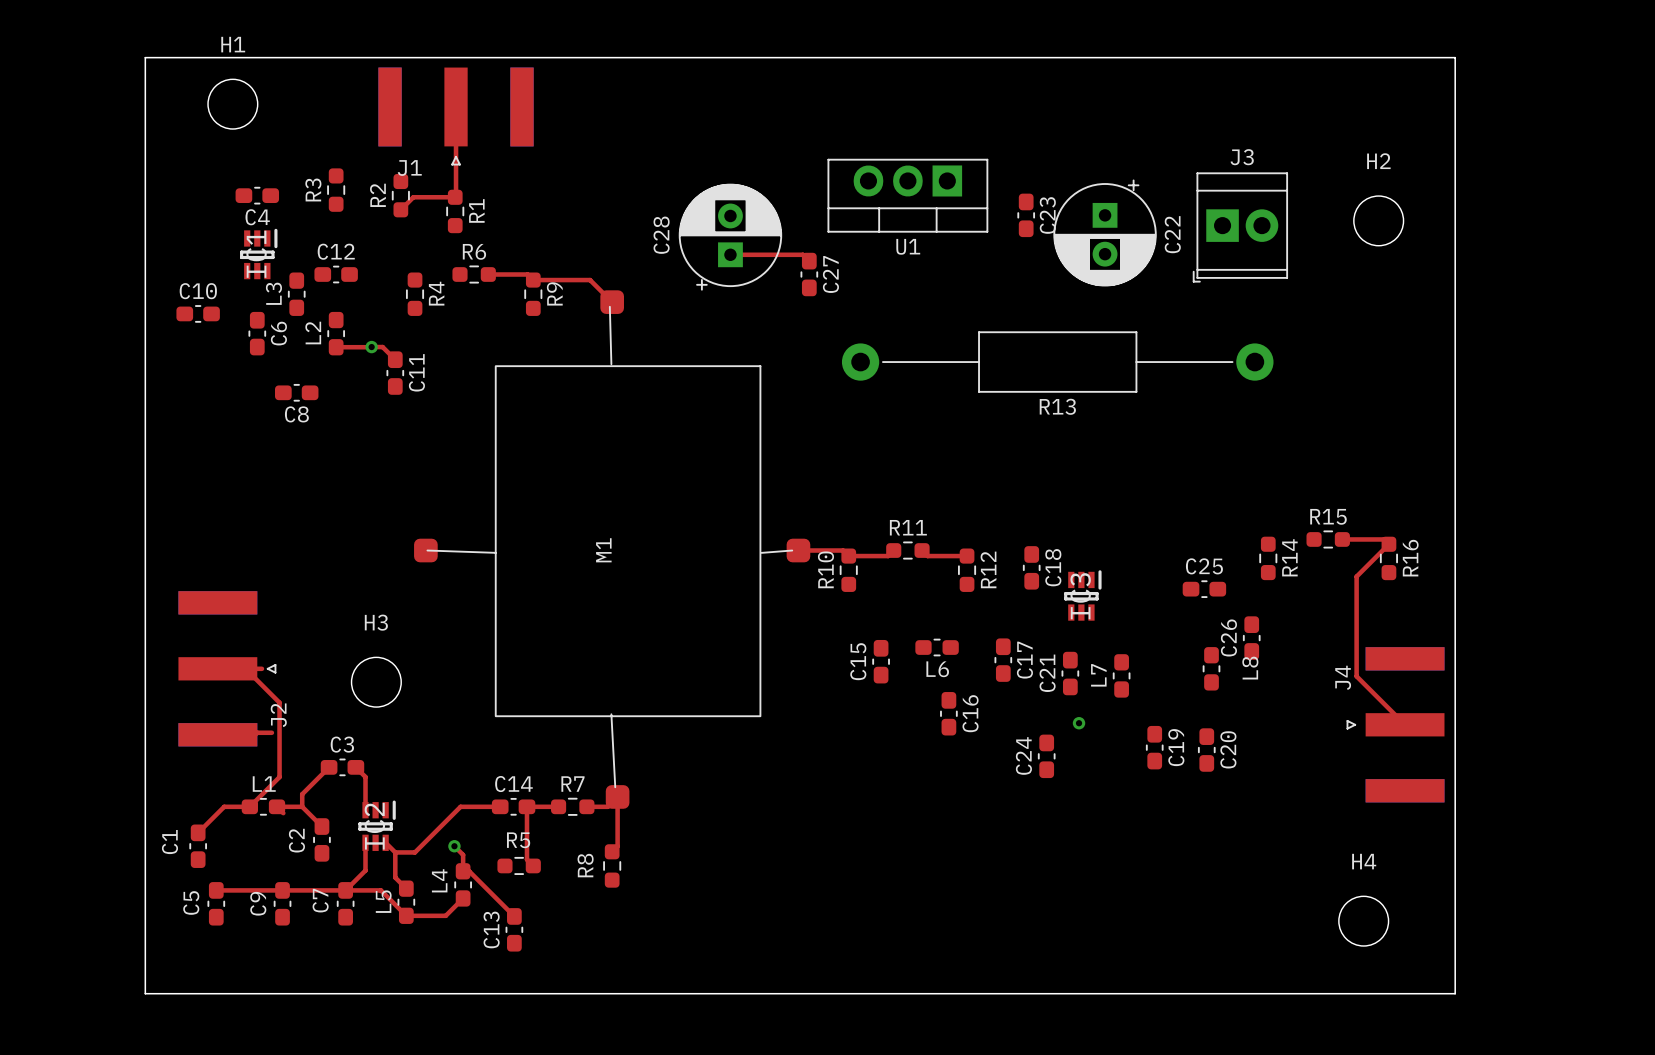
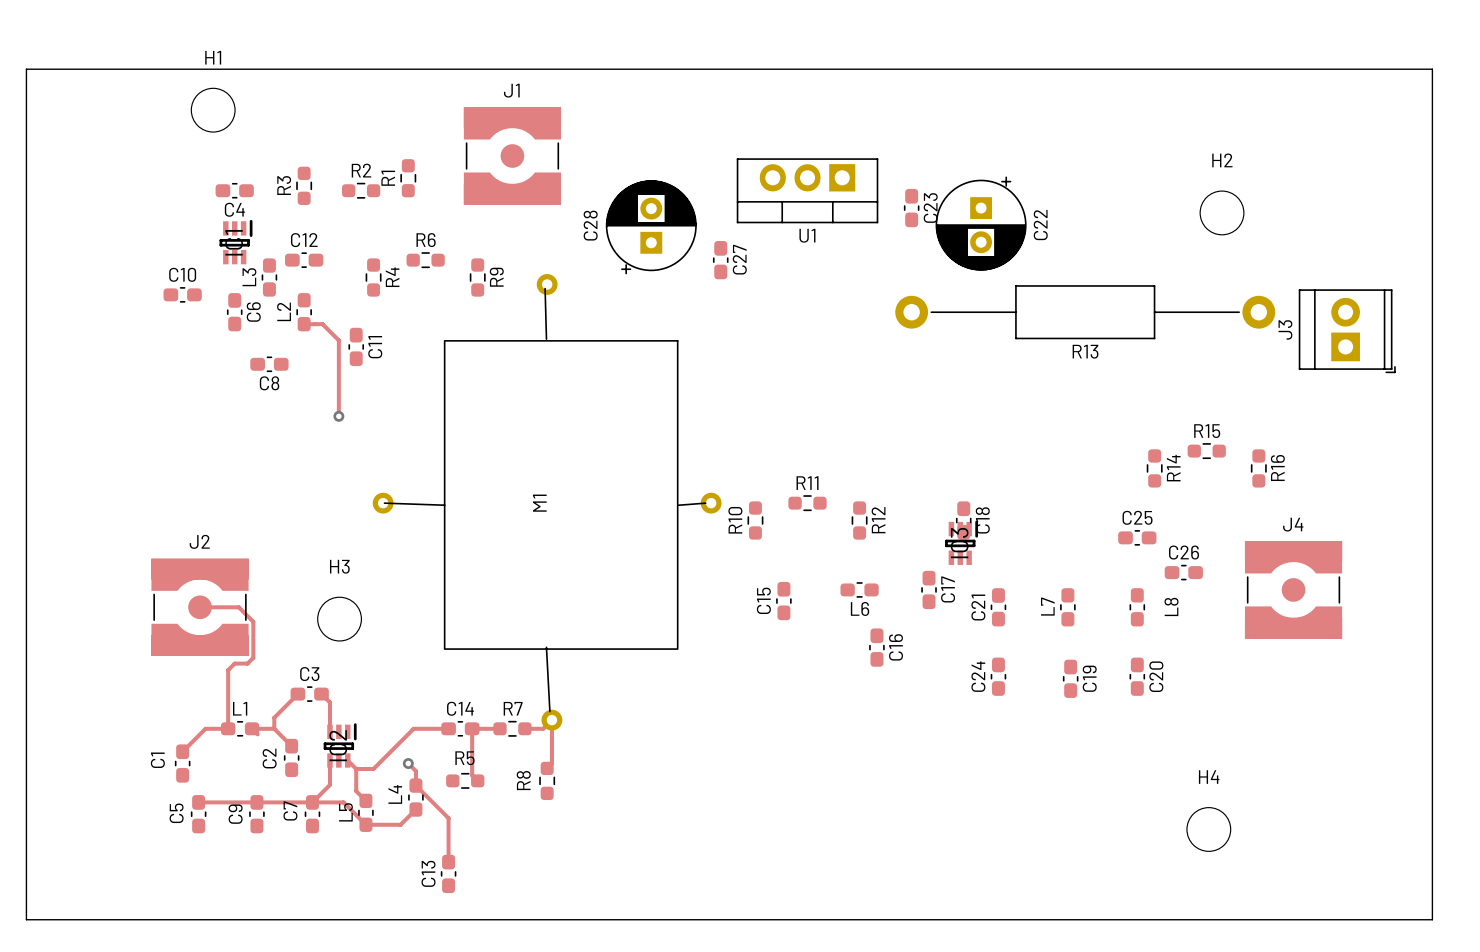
board edge: (145, 57) (145, 993) (1455, 993) (1455, 57) -> (136, 69) (26, 69) (26, 919) (1432, 919) (1432, 69) (1289, 69)
J1 footprint: [378, 67, 534, 166] -> [463, 107, 562, 205]
top track: (456, 106) (456, 196) (413, 197) (400, 209) -> none
J1 name position: J1 (409, 168) -> J1 (511, 90)
R2 rotation: 0° (400, 195) -> 90° clockwise (361, 190)
R1 name position: R1 (476, 210) -> R1 (388, 178)
R1 position: (455, 211) -> (408, 178)
J3 rotation: 0° (1240, 227) -> 90° counterclockwise (1347, 331)
J3 position: (1240, 227) -> (1347, 331)
top track: (730, 254) (802, 254) (809, 261) -> none
top track: (488, 274) (527, 274) (533, 280) (590, 280) (612, 302) -> none
M1 footprint: [414, 290, 811, 809] -> [372, 274, 722, 731]
top track: (357, 347) (371, 347) -> (322, 324) (338, 340) (338, 416)
top track: (371, 347) (382, 347) (395, 359) -> none
via: (371, 347) -> none
R13 position: (1057, 362) -> (1085, 312)
via: none -> (338, 416)
R15 position: (1328, 539) -> (1206, 451)
top track: (1342, 539) (1384, 539) (1388, 544) (1356, 576) (1356, 676) (1405, 724) -> none
top track: (798, 550) (843, 550) (848, 556) (888, 556) (893, 550) -> none
top track: (922, 550) (927, 556) (967, 556) -> none
R14 position: (1268, 558) -> (1154, 468)
R16 position: (1388, 558) -> (1258, 468)
C18 position: (1031, 567) -> (963, 520)
C25 position: (1204, 589) -> (1137, 537)
J2 footprint: [178, 591, 277, 747] -> [151, 558, 249, 656]
C26 rotation: 0° (1251, 638) -> 90° clockwise (1183, 572)
C26 position: (1251, 638) -> (1183, 572)
L6 position: (937, 647) -> (859, 589)
J4 footprint: [1346, 647, 1445, 803] -> [1244, 541, 1343, 639]
C17 position: (1003, 660) -> (929, 589)
top track: (245, 668) (279, 702) (279, 777) (249, 806) -> (228, 670) (228, 728)
top track: none -> (238, 607) (253, 621) (253, 657) (247, 663)
L8 position: (1211, 668) -> (1137, 607)
C21 position: (1070, 673) -> (998, 607)
L7 position: (1121, 675) -> (1067, 607)
J4 name position: J4 (1343, 677) -> J4 (1293, 524)
C16 position: (948, 713) -> (876, 647)
J2 name position: J2 (278, 715) -> J2 (199, 541)
via: (1079, 723) -> none
C19: (1154, 747) -> none
C20: none -> (1137, 676)
C20 name: C20 (1228, 749) -> C19 (1089, 678)
C24 position: (1046, 756) -> (998, 676)
top track: (463, 871) (469, 871) (514, 916) -> (415, 785) (448, 818) (448, 862)
C13 position: (514, 929) -> (448, 873)

